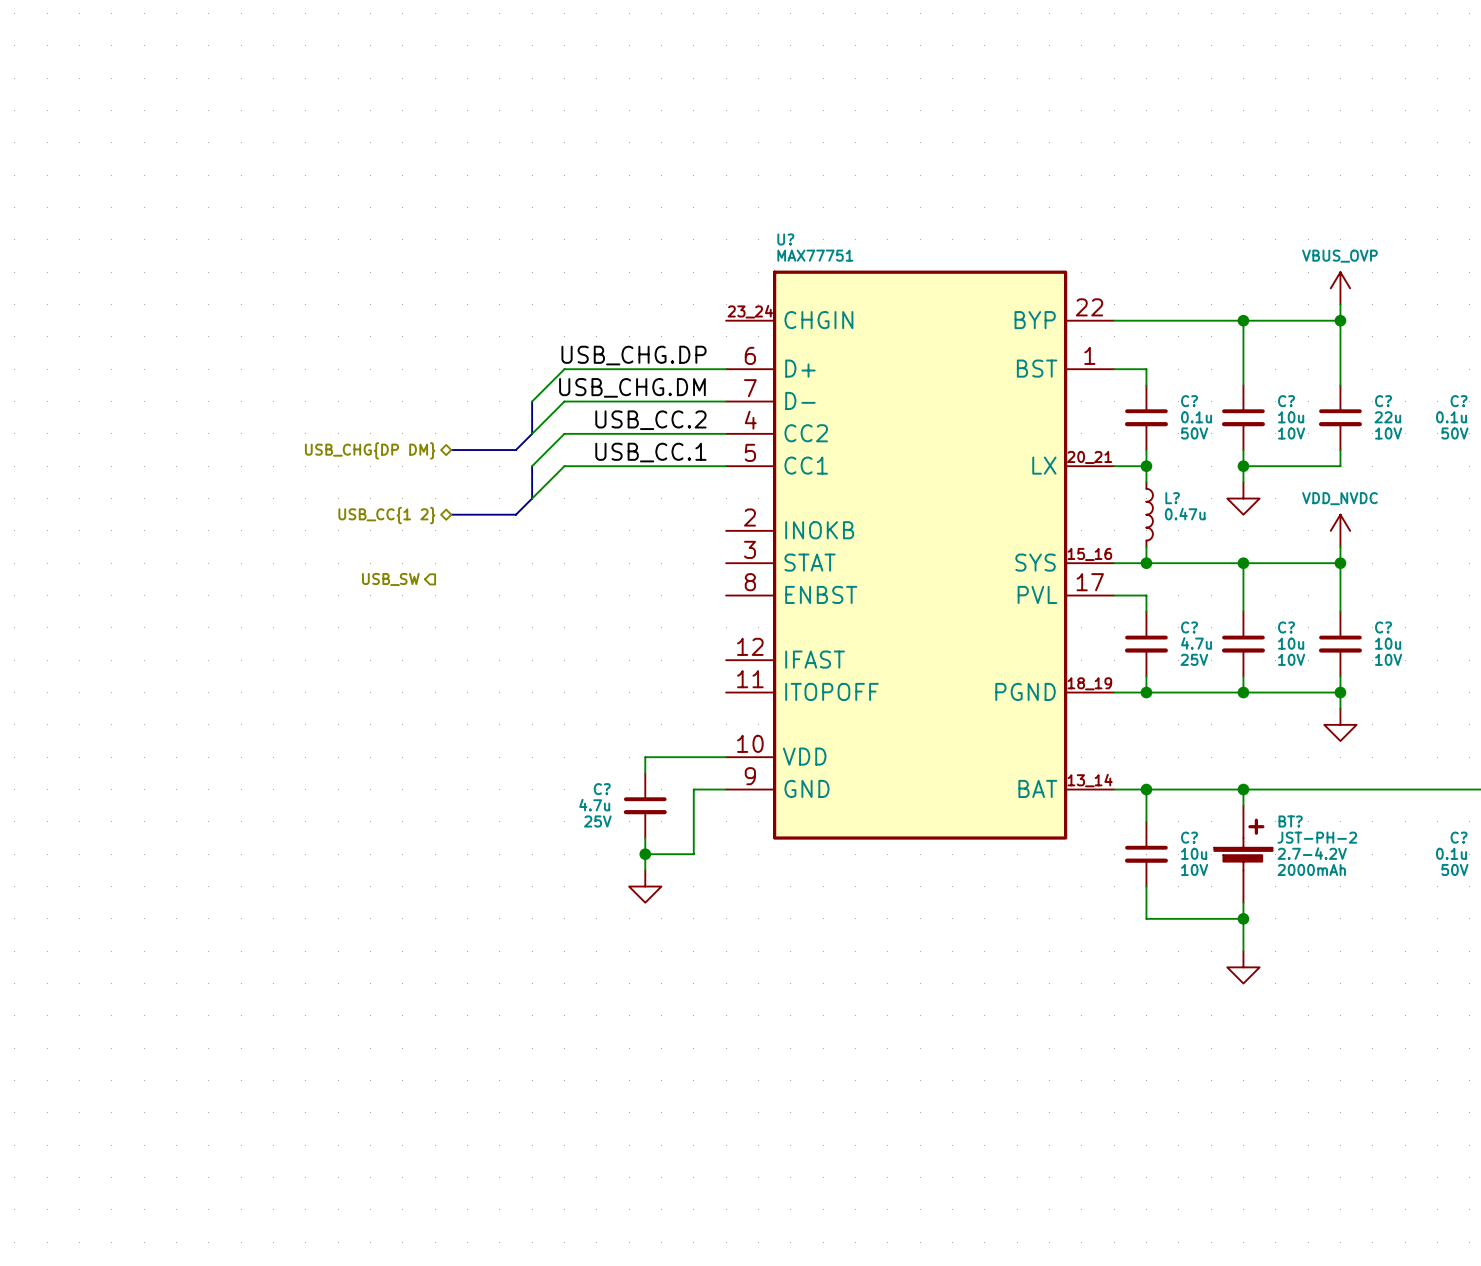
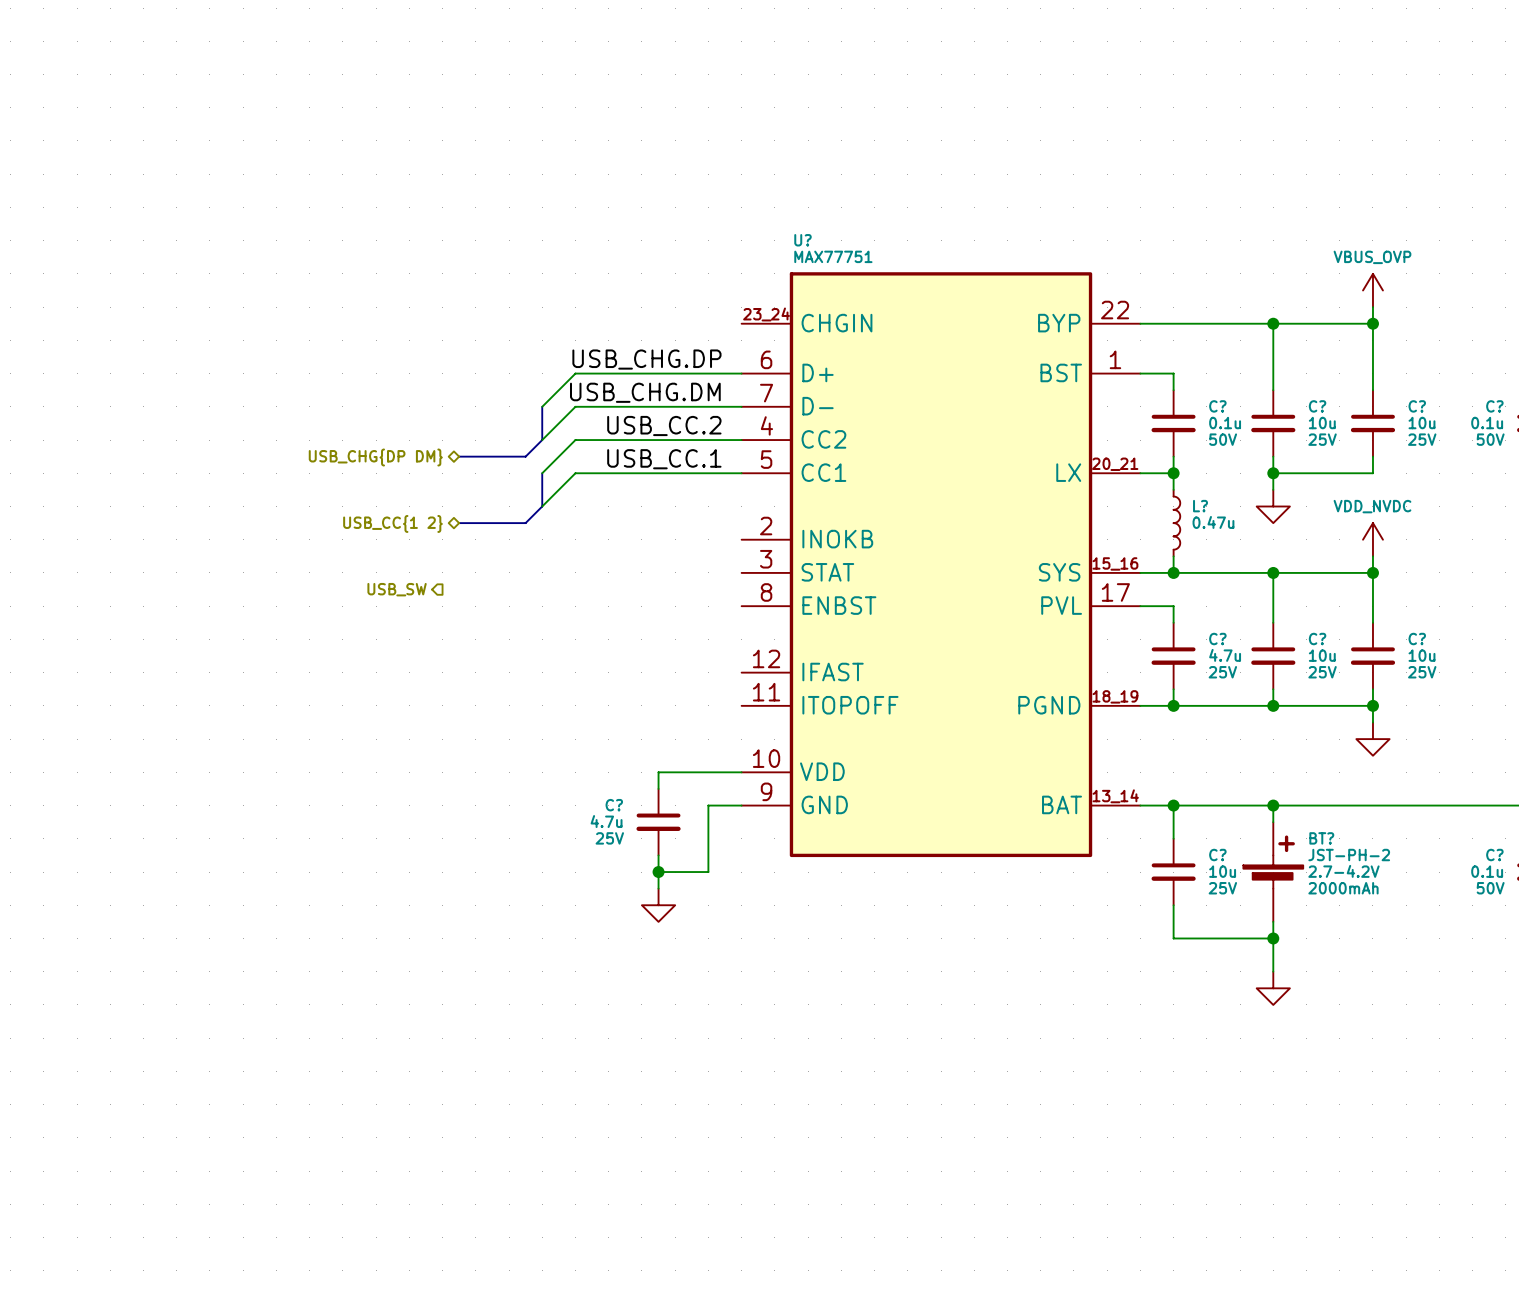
C? value: 22u (1387, 417) -> 10u (1421, 423)
C? text: 10V (1291, 433) -> 25V (1322, 439)
C? text: 10V (1388, 433) -> 25V (1422, 439)
C? text: 10V (1291, 659) -> 25V (1322, 672)
C? text: 10V (1388, 659) -> 25V (1422, 672)
C? text: 10V (1194, 869) -> 25V (1222, 888)

